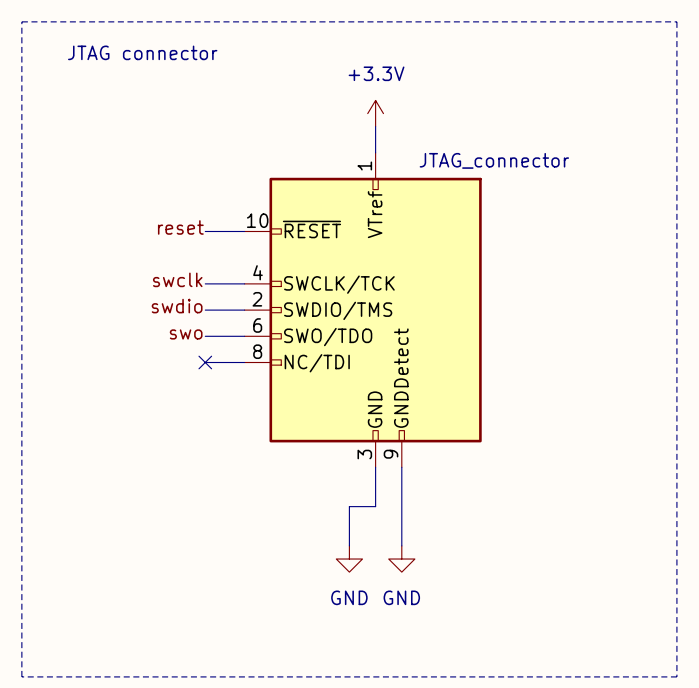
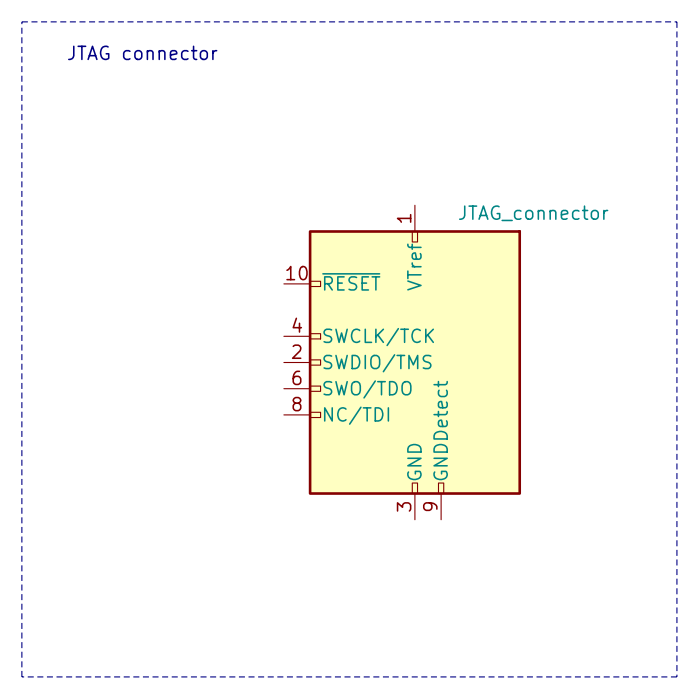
power symbol: +3.3V (375, 113) -> none
wire: (375, 126) (375, 152) -> none
label: reset (180, 227) -> none
wire: (205, 231) (244, 231) -> none
label: swclk (177, 279) -> none
wire: (205, 283) (244, 283) -> none
label: swdio (177, 306) -> none
wire: (205, 310) (244, 310) -> none
part position: (363, 310) -> (402, 362)
label: swo (186, 334) -> none
wire: (205, 336) (244, 336) -> none
wire: (205, 362) (244, 362) -> none
no-connect mark: (205, 362) -> none
wire: (375, 467) (375, 506) (349, 506) (349, 545) -> none
wire: (401, 467) (401, 545) -> none
power symbol: GND (349, 559) -> none
power symbol: GND (401, 559) -> none

